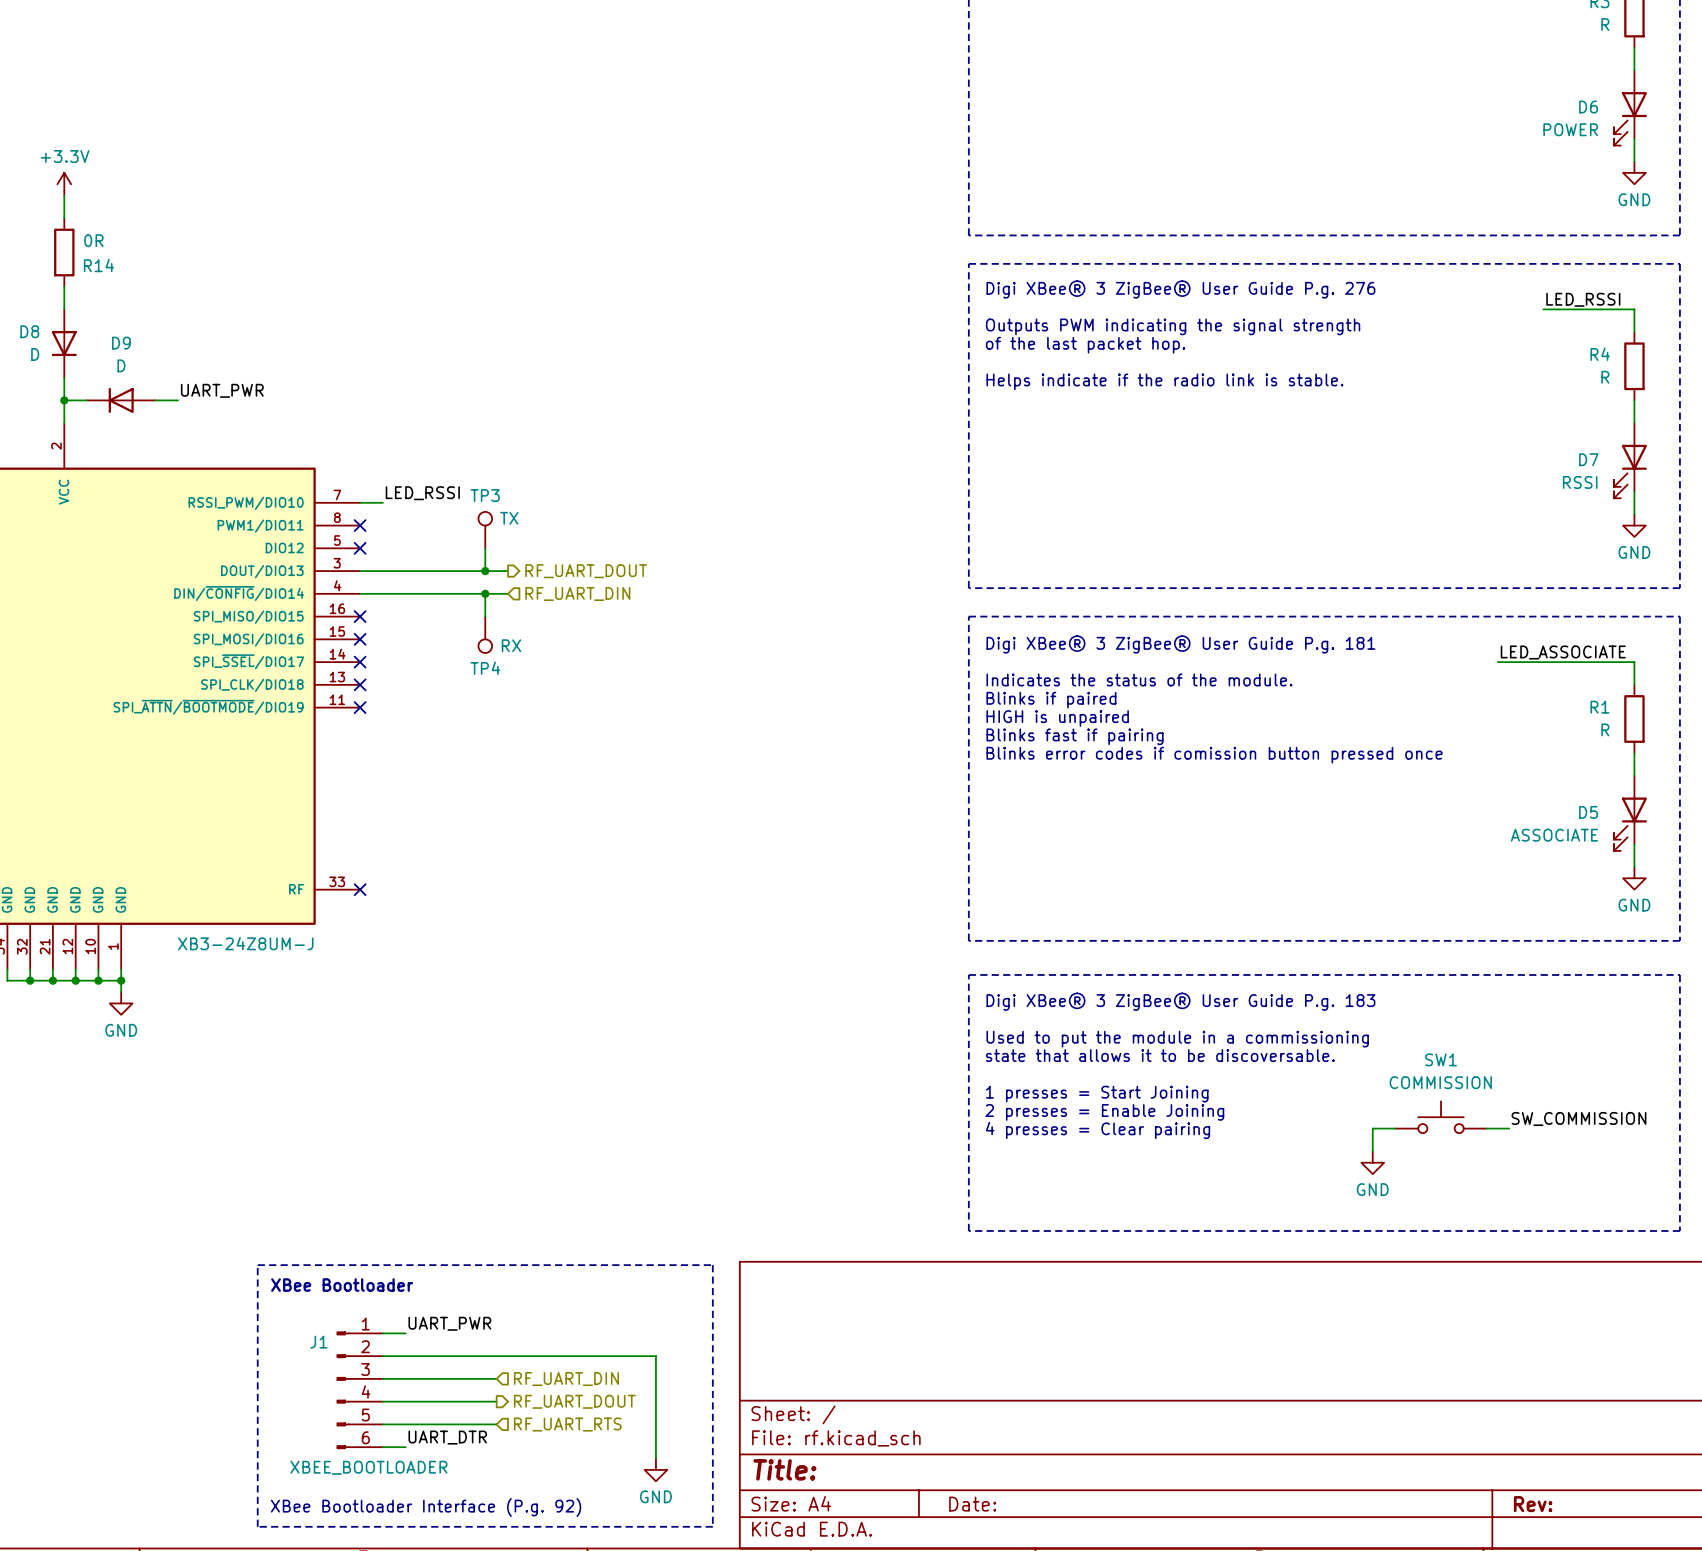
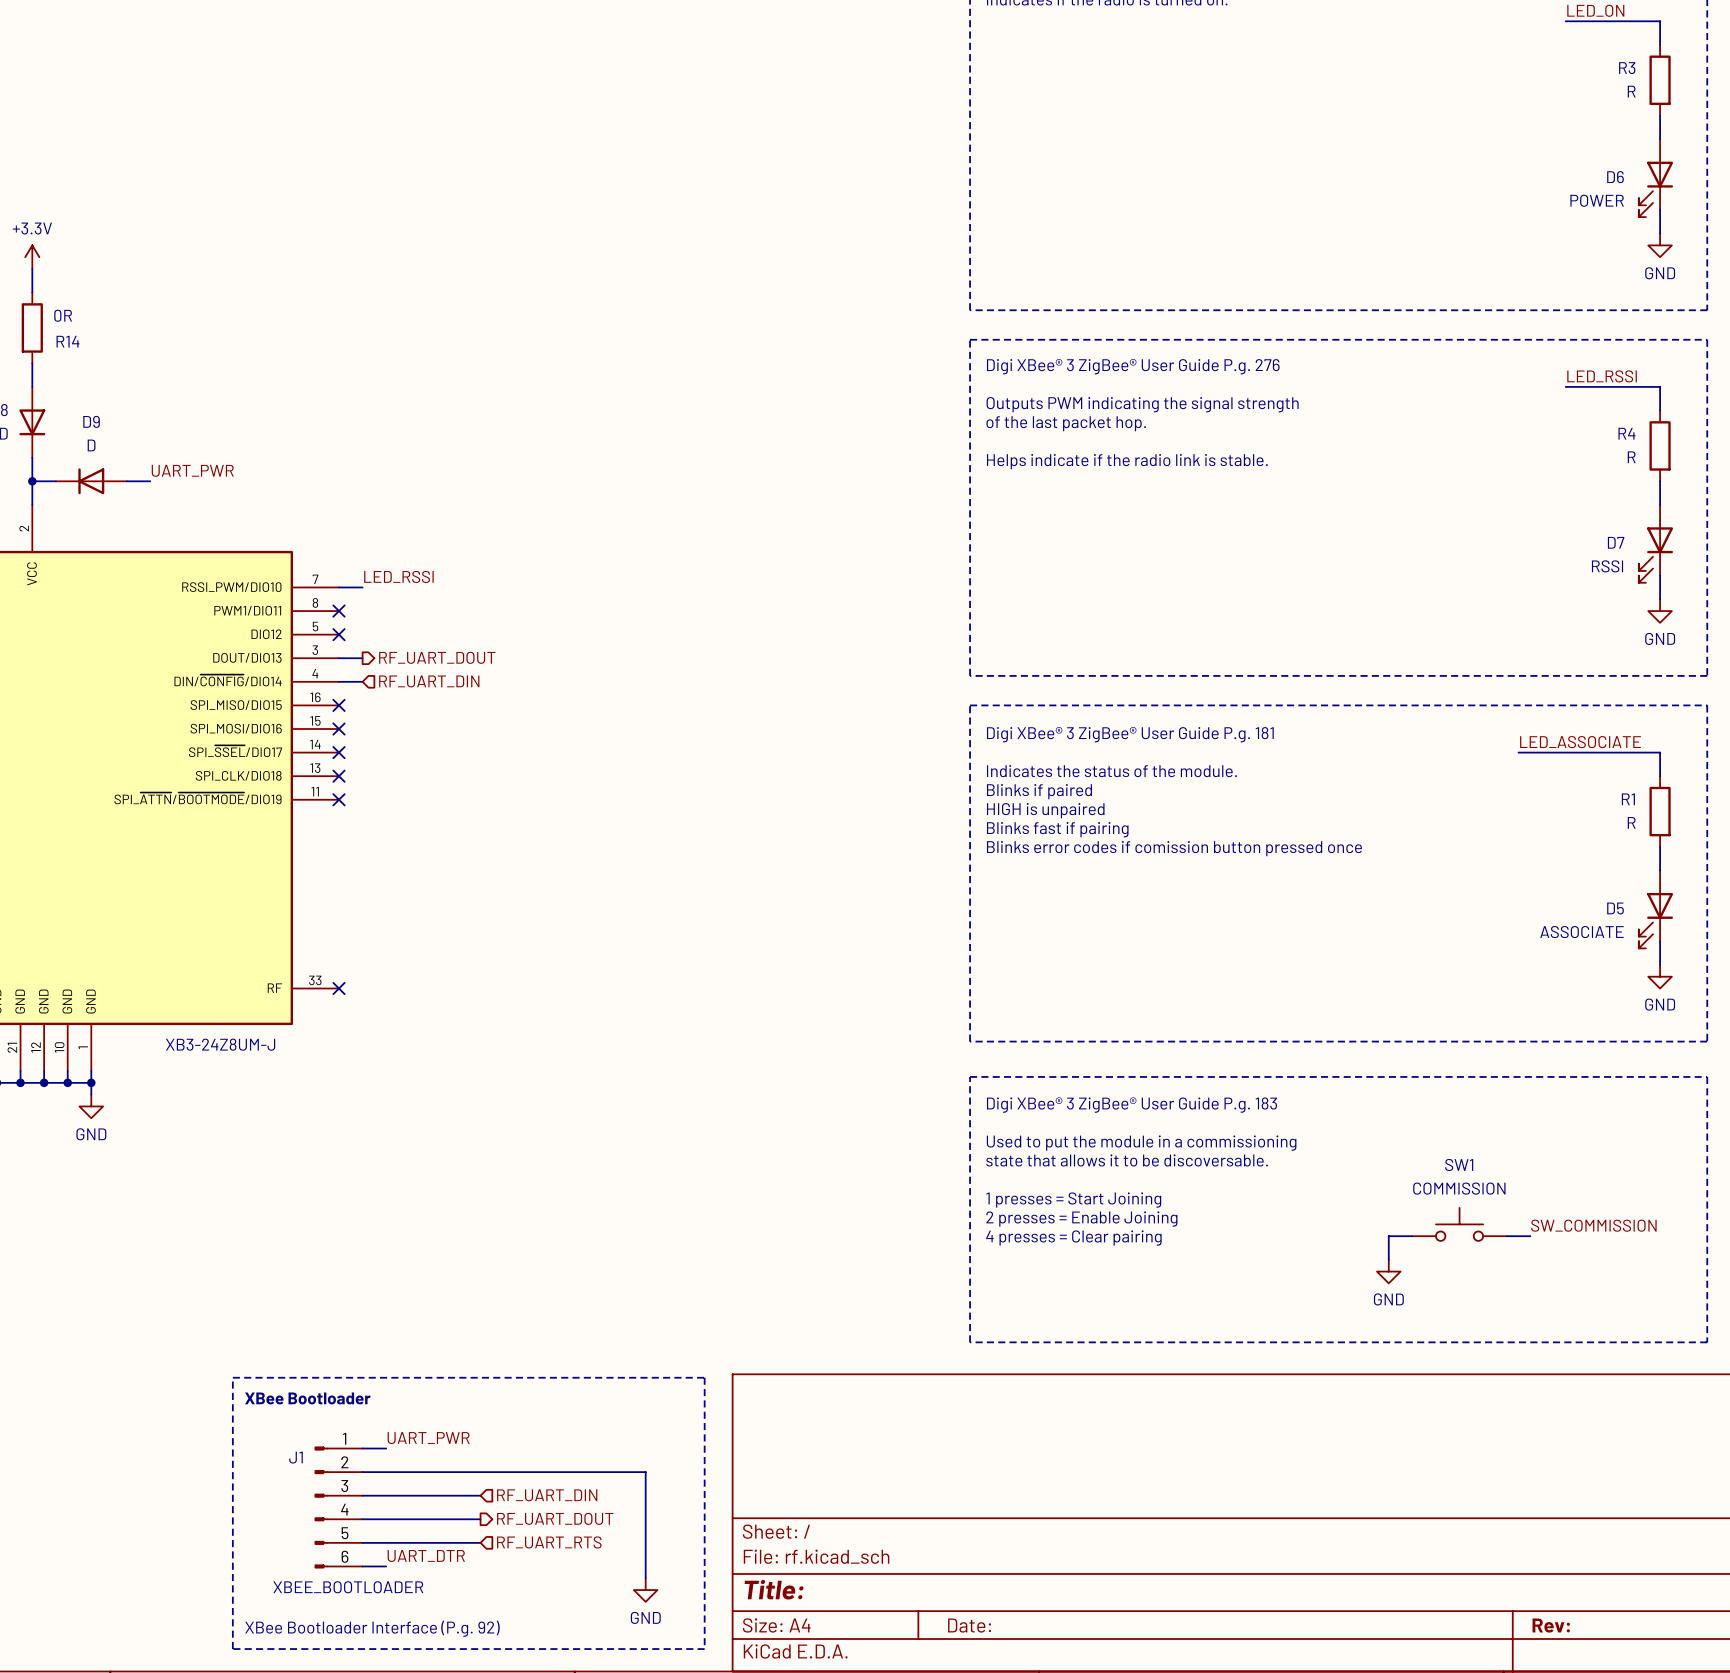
TP3: TX (485, 530) -> none
wire: (485, 548) (485, 571) -> none
wire: (382, 571) (508, 571) -> none
junction: (485, 571) -> none
hierarchical label position: RF_UART_DOUT (586, 571) -> RF_UART_DOUT (437, 657)
wire: (382, 593) (508, 593) -> none
wire: (485, 593) (485, 616) -> none
junction: (485, 593) -> none
hierarchical label position: RF_UART_DIN (577, 593) -> RF_UART_DIN (429, 681)
TP4: RX (485, 634) -> none

